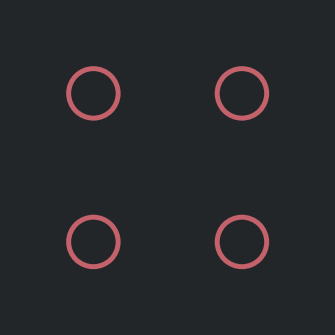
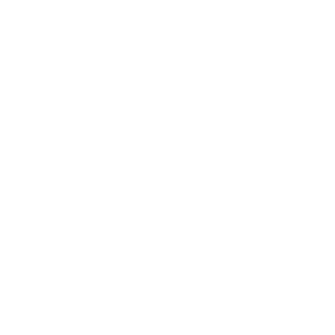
part: (93, 93) -> none
part: (241, 93) -> none
part: (93, 241) -> none
part: (241, 241) -> none

